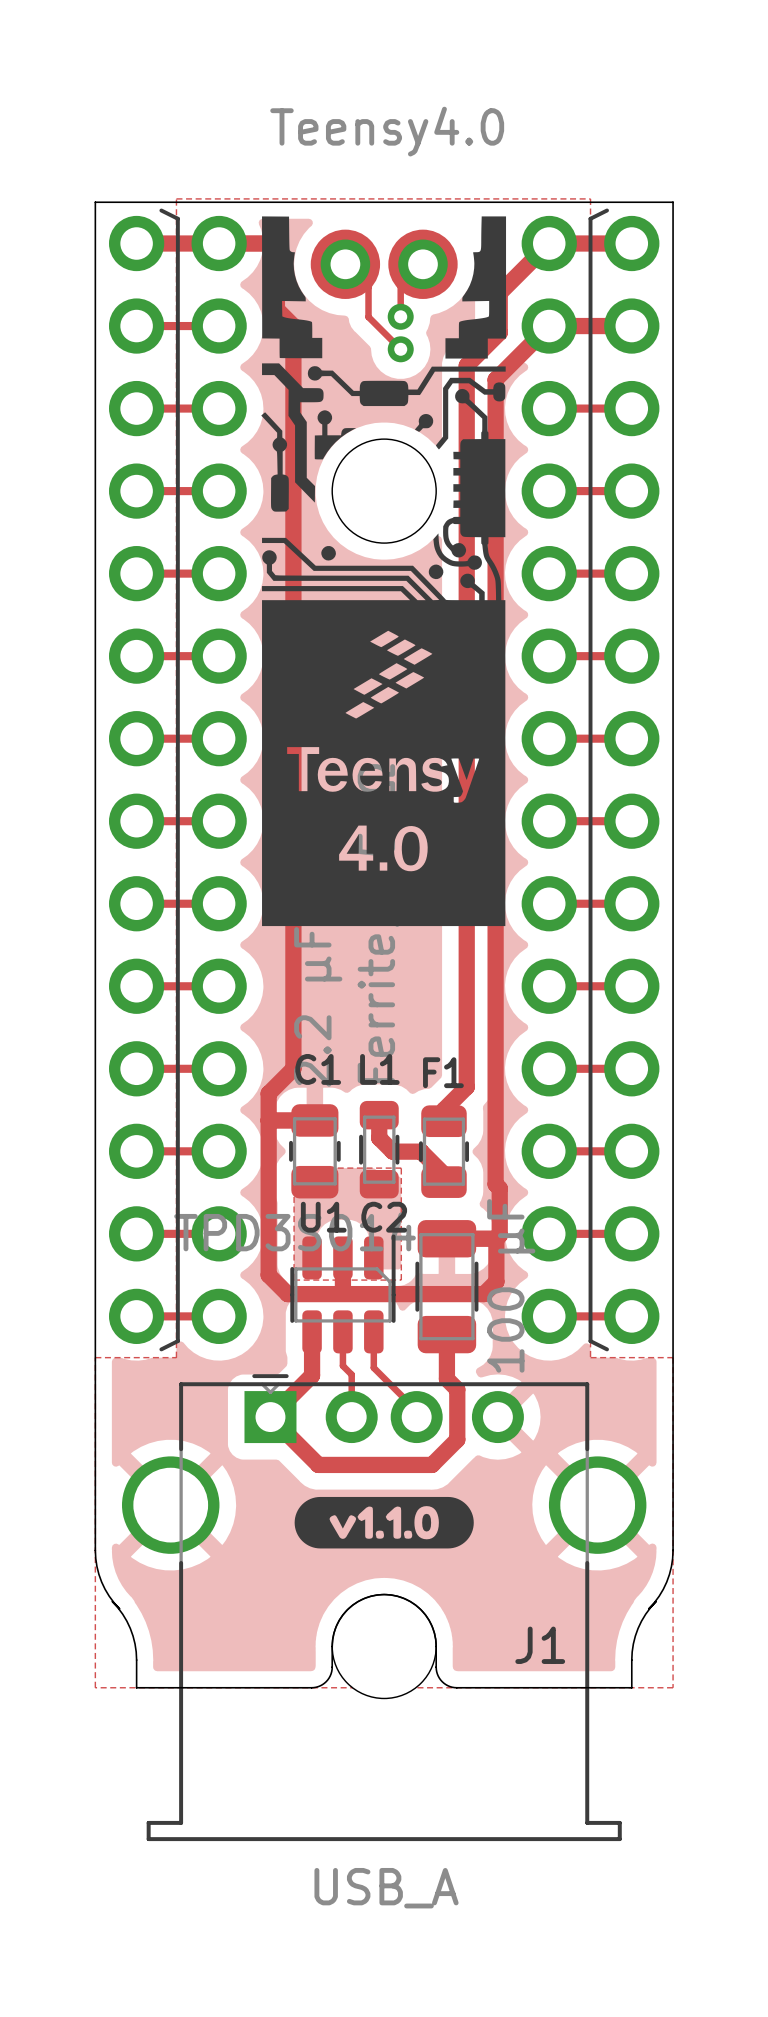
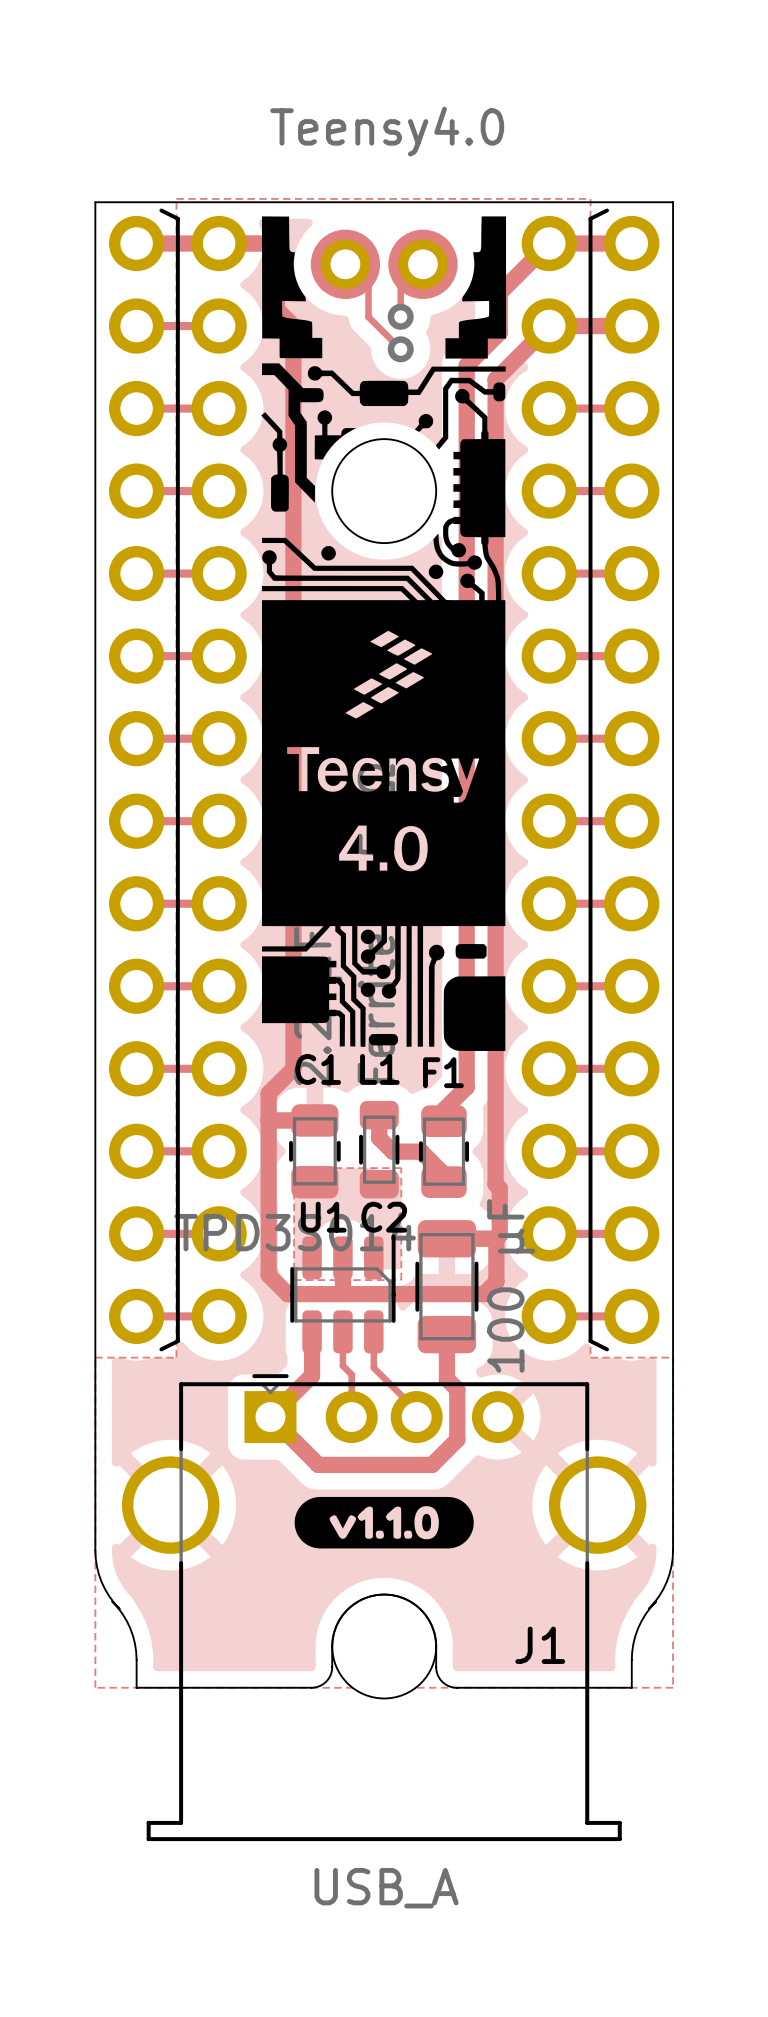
drawing: [261, 216, 507, 927] -> none
drawing: none -> [261, 216, 507, 1051]

